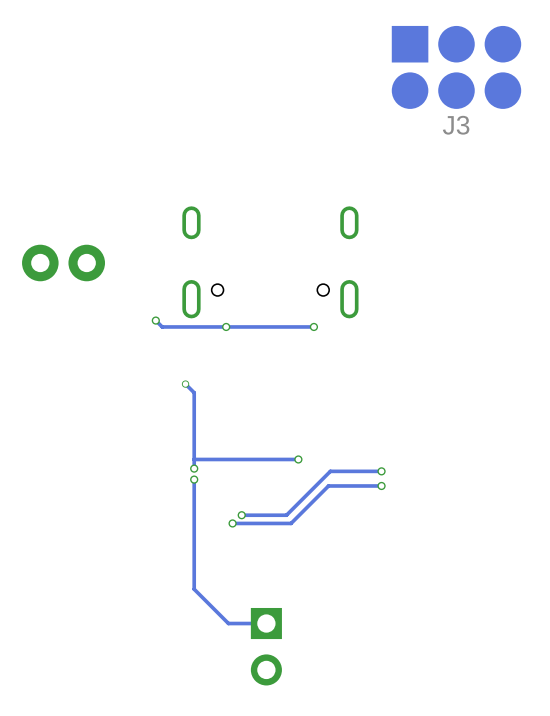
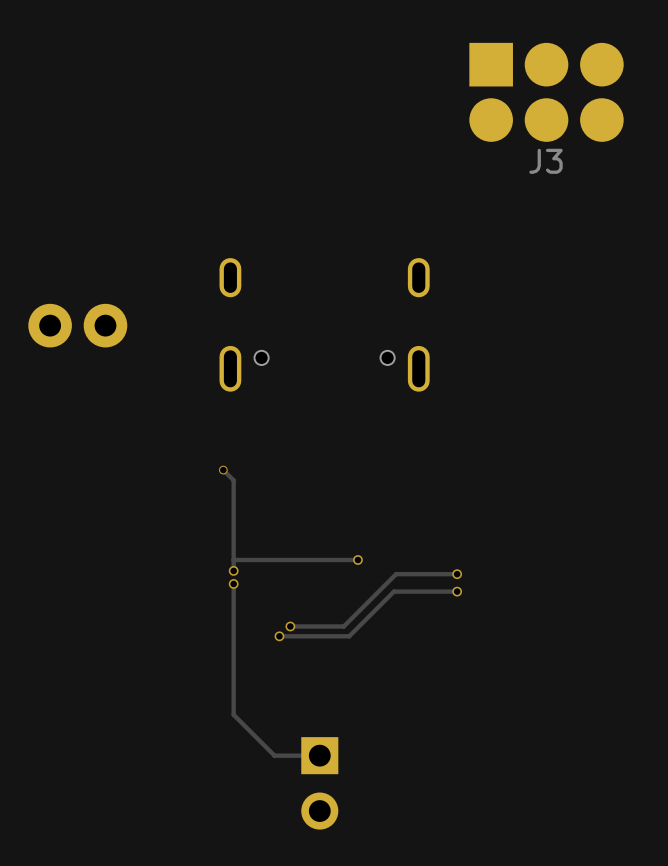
track: (155, 320) (162, 326) (313, 326) -> none
via: (155, 320) -> none
via: (226, 326) -> none
via: (313, 326) -> none

